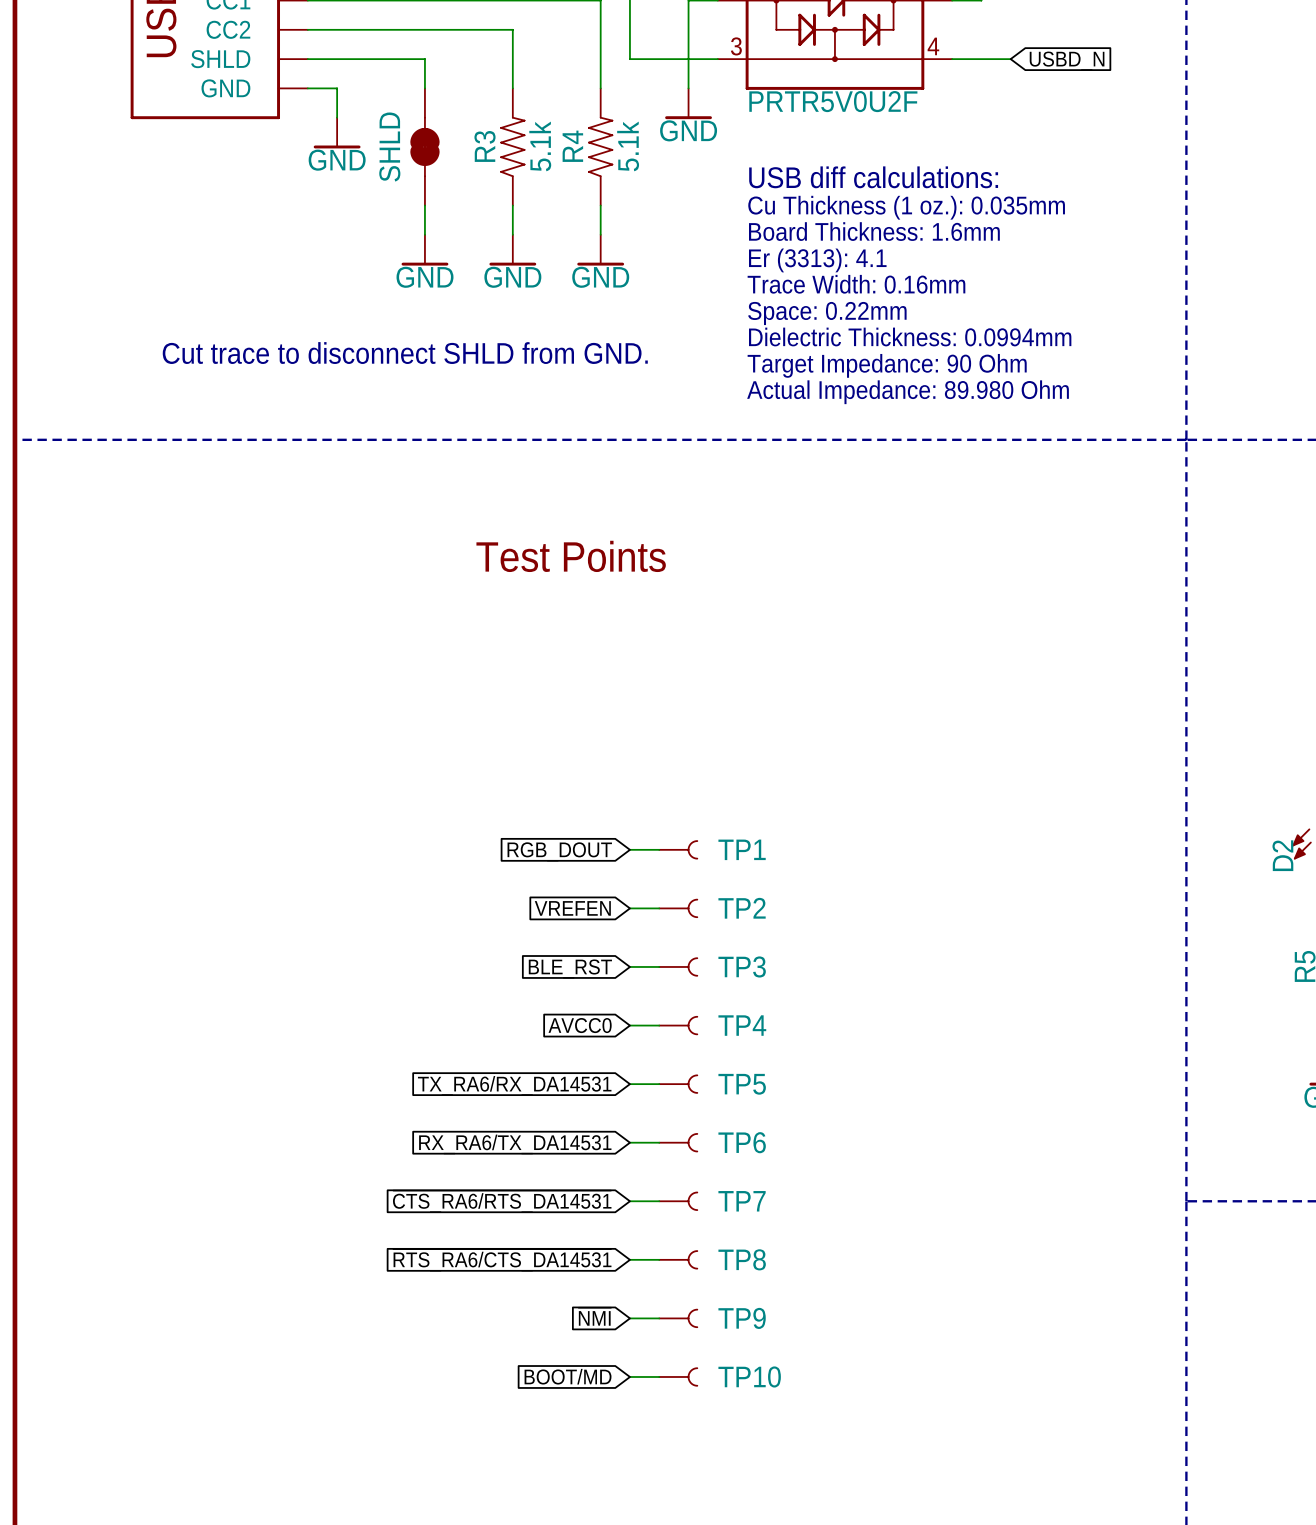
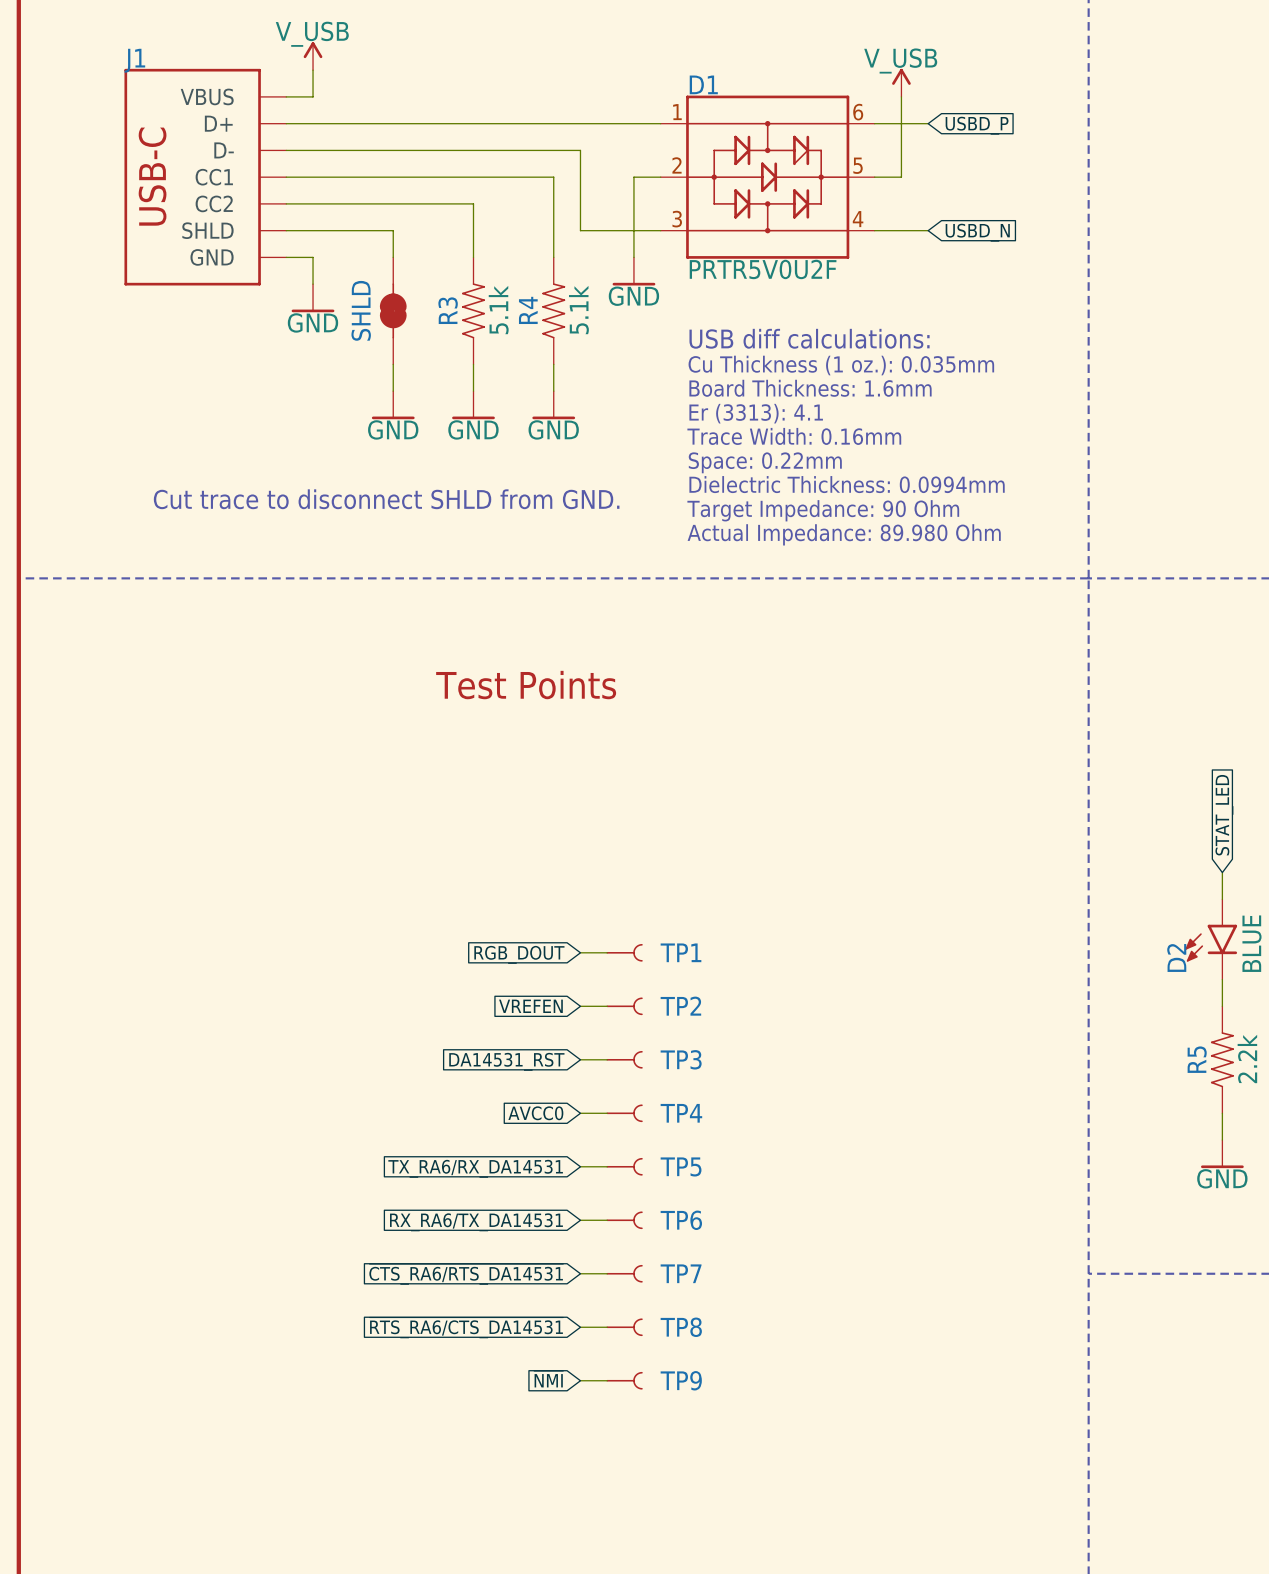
global label: BLE_RST (570, 968) -> DA14531_RST (506, 1061)
global label: BOOT/MD (568, 1376) -> none
wire: (629, 1376) (659, 1376) -> none
TP10: (678, 1376) -> none

